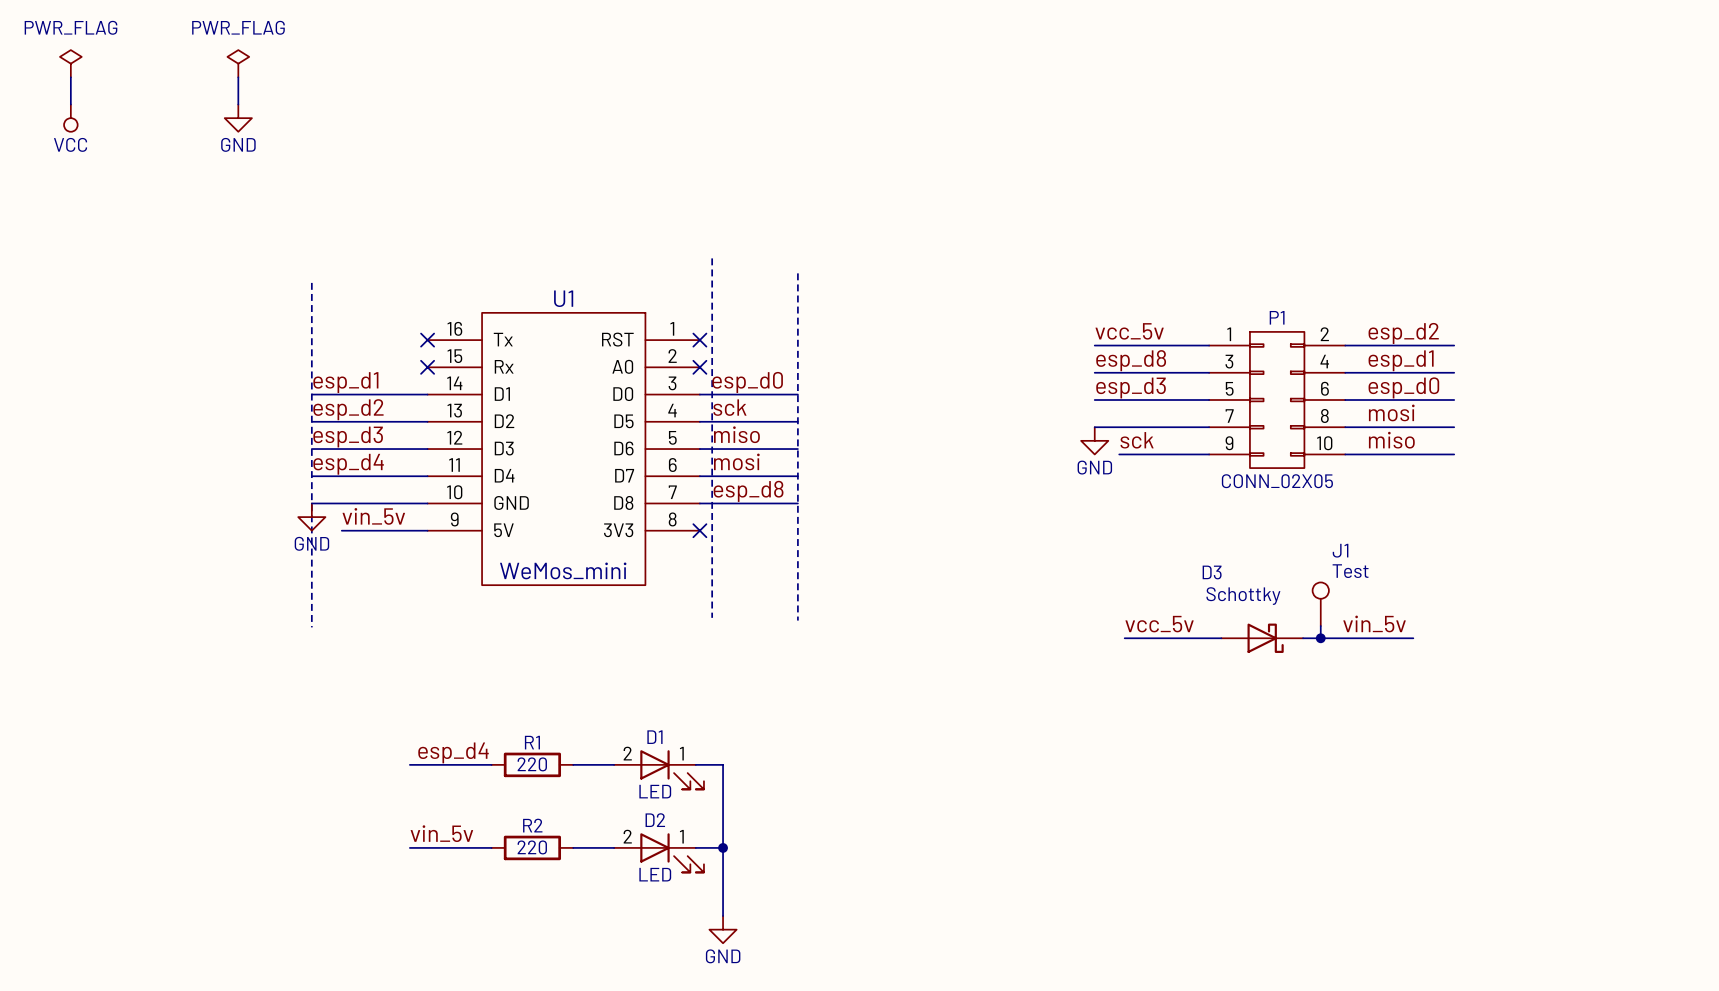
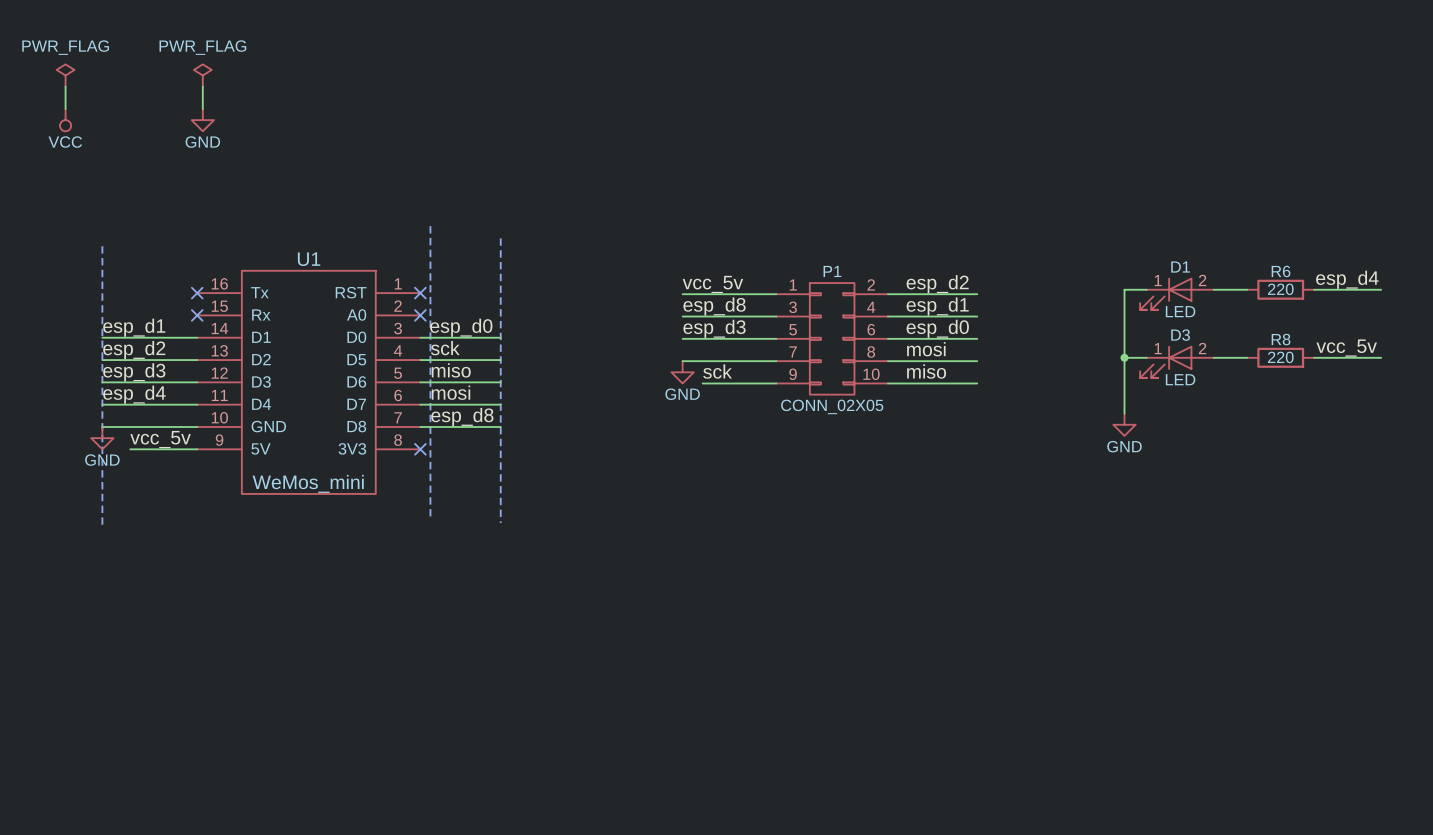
line: (712, 258) (712, 617) -> (430, 226) (430, 520)
line: (797, 273) (797, 620) -> (500, 238) (500, 522)
line: (311, 282) (311, 627) -> (102, 246) (102, 528)
label: none -> esp_d4 (1347, 279)
label: none -> vcc_5v (712, 284)
label: none -> esp_d2 (937, 284)
wire: none -> (1146, 289) (1124, 289) (1124, 413)
wire: none -> (1213, 289) (1247, 289)
R6: none -> 220 (1280, 289)
wire: none -> (1314, 289) (1381, 289)
no-connect mark: none -> (197, 293)
no-connect mark: none -> (420, 293)
wire: none -> (682, 294) (776, 294)
wire: none -> (887, 294) (977, 294)
label: vcc_5v (1129, 331) -> none
label: esp_d2 (1403, 333) -> none
no-connect mark: (427, 340) -> none
no-connect mark: (699, 340) -> none
label: none -> esp_d8 (714, 306)
wire: (1094, 345) (1209, 345) -> none
label: none -> esp_d1 (937, 306)
wire: (1345, 345) (1454, 345) -> none
no-connect mark: none -> (197, 315)
no-connect mark: none -> (420, 315)
wire: none -> (682, 316) (776, 316)
wire: none -> (887, 316) (977, 316)
label: esp_d8 (1131, 360) -> none
label: esp_d1 (1401, 360) -> none
no-connect mark: (427, 367) -> none
no-connect mark: (699, 367) -> none
label: none -> esp_d0 (461, 327)
wire: (1094, 372) (1209, 372) -> none
label: none -> esp_d0 (937, 328)
wire: (1345, 372) (1454, 372) -> none
label: none -> esp_d3 (714, 328)
label position: esp_d1 (345, 382) -> esp_d1 (134, 327)
label: esp_d0 (747, 382) -> none
wire: none -> (682, 338) (776, 338)
wire: none -> (887, 338) (977, 338)
label: esp_d0 (1403, 387) -> none
label: esp_d3 (1131, 388) -> none
wire: (311, 394) (427, 394) -> (102, 337) (197, 337)
wire: (699, 394) (797, 394) -> (420, 337) (500, 337)
label: none -> vcc_5v (1346, 348)
label: none -> sck (445, 348)
label: none -> mosi (926, 349)
wire: (1094, 400) (1209, 400) -> none
P1 position: (1277, 400) -> (832, 338)
wire: (1345, 400) (1454, 400) -> none
label: sck (729, 407) -> none
wire: none -> (1124, 357) (1146, 357)
junction: none -> (1124, 357)
wire: none -> (1213, 357) (1247, 357)
R8: none -> 220 (1280, 357)
wire: none -> (1314, 357) (1381, 357)
label position: esp_d2 (348, 409) -> esp_d2 (134, 350)
wire: none -> (682, 361) (776, 361)
wire: none -> (887, 361) (977, 361)
label: mosi (1391, 412) -> none
wire: (311, 421) (427, 421) -> (102, 360) (197, 360)
wire: (699, 421) (797, 421) -> (420, 360) (500, 360)
label: none -> miso (451, 370)
power symbol: none -> GND (682, 372)
label: none -> sck (717, 371)
label: none -> miso (926, 371)
wire: (1094, 427) (1209, 427) -> none
wire: (1345, 427) (1454, 427) -> none
label: miso (736, 434) -> none
label position: esp_d3 (348, 437) -> esp_d3 (134, 372)
wire: none -> (702, 383) (776, 383)
wire: none -> (887, 383) (977, 383)
power symbol: GND (1094, 440) -> none
label: sck (1137, 440) -> none
label: miso (1391, 440) -> none
wire: (311, 449) (427, 449) -> (102, 382) (197, 382)
U1 position: (563, 449) -> (308, 382)
wire: (699, 449) (797, 449) -> (420, 382) (500, 382)
label: none -> mosi (450, 392)
wire: (1119, 454) (1209, 454) -> none
wire: (1345, 454) (1454, 454) -> none
label: mosi (736, 461) -> none
label position: esp_d4 (348, 464) -> esp_d4 (134, 394)
wire: (311, 476) (427, 476) -> (102, 404) (197, 404)
wire: (699, 476) (797, 476) -> (420, 404) (500, 404)
label: none -> esp_d8 (462, 416)
power symbol: none -> GND (1124, 424)
label: esp_d8 (748, 491) -> none
wire: (311, 503) (427, 503) -> (102, 427) (197, 427)
wire: (699, 503) (797, 503) -> (420, 427) (500, 427)
label: none -> vcc_5v (160, 439)
label: vin_5v (373, 516) -> none
power symbol position: GND (311, 517) -> GND (102, 438)
wire: none -> (130, 449) (197, 449)
no-connect mark: none -> (420, 449)
wire: (341, 530) (427, 530) -> none
no-connect mark: (699, 530) -> none
D3 name position: D3 (1212, 572) -> D3 (1180, 335)
D3 value: Schottky (1243, 596) -> LED (1180, 379)
J1: Test (1320, 604) -> none
D3 symbol: [1221, 623, 1304, 653] -> [1140, 345, 1214, 378]
label: vin_5v (1374, 623) -> none
label: vcc_5v (1159, 624) -> none
wire: (1320, 626) (1320, 638) -> none
wire: (1124, 638) (1221, 638) -> none
wire: (1303, 638) (1413, 638) -> none
junction: (1320, 638) -> none
label: esp_d4 (453, 752) -> none
wire: (409, 764) (491, 764) -> none
R1: 220 (532, 764) -> none
wire: (573, 764) (614, 764) -> none
wire: (695, 764) (723, 764) (723, 916) -> none
D1 position: (659, 769) -> (1176, 293)
D1 flip: as is (672, 769) -> left-right (1166, 293)
label: vin_5v (441, 833) -> none
wire: (409, 847) (491, 847) -> none
R2: 220 (532, 847) -> none
wire: (573, 847) (614, 847) -> none
wire: (695, 847) (723, 847) -> none
junction: (723, 847) -> none
D2: LED (659, 852) -> none
power symbol: GND (723, 929) -> none

